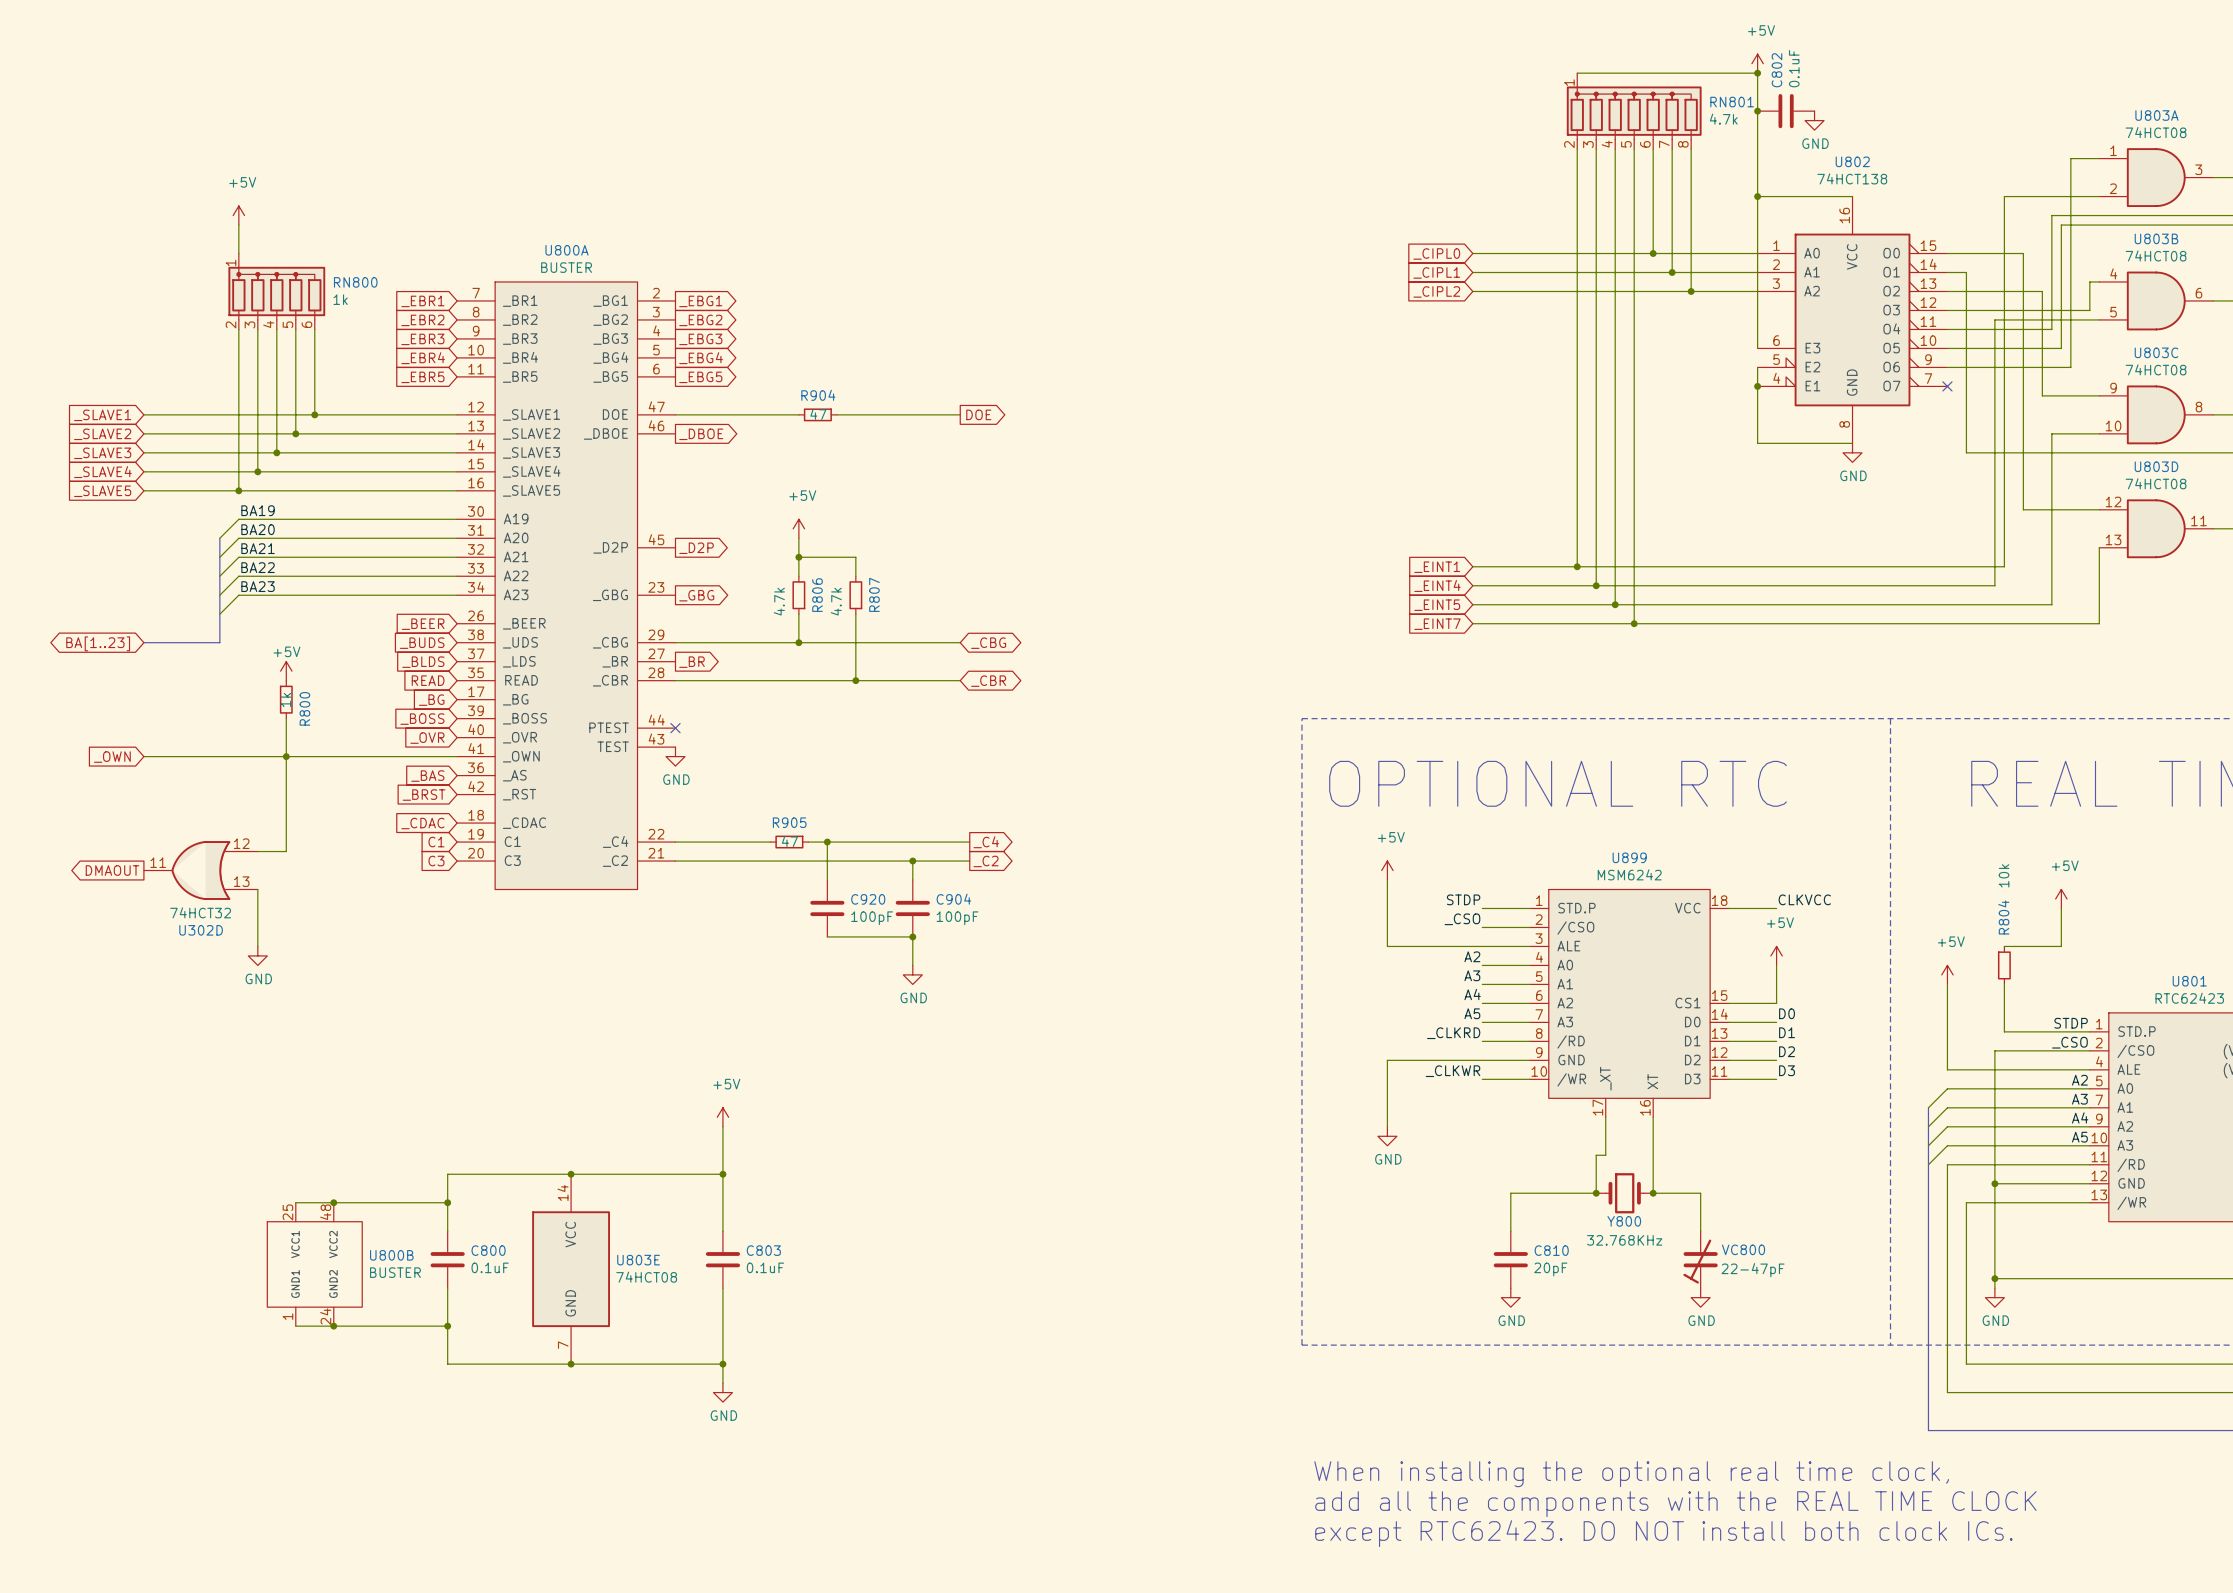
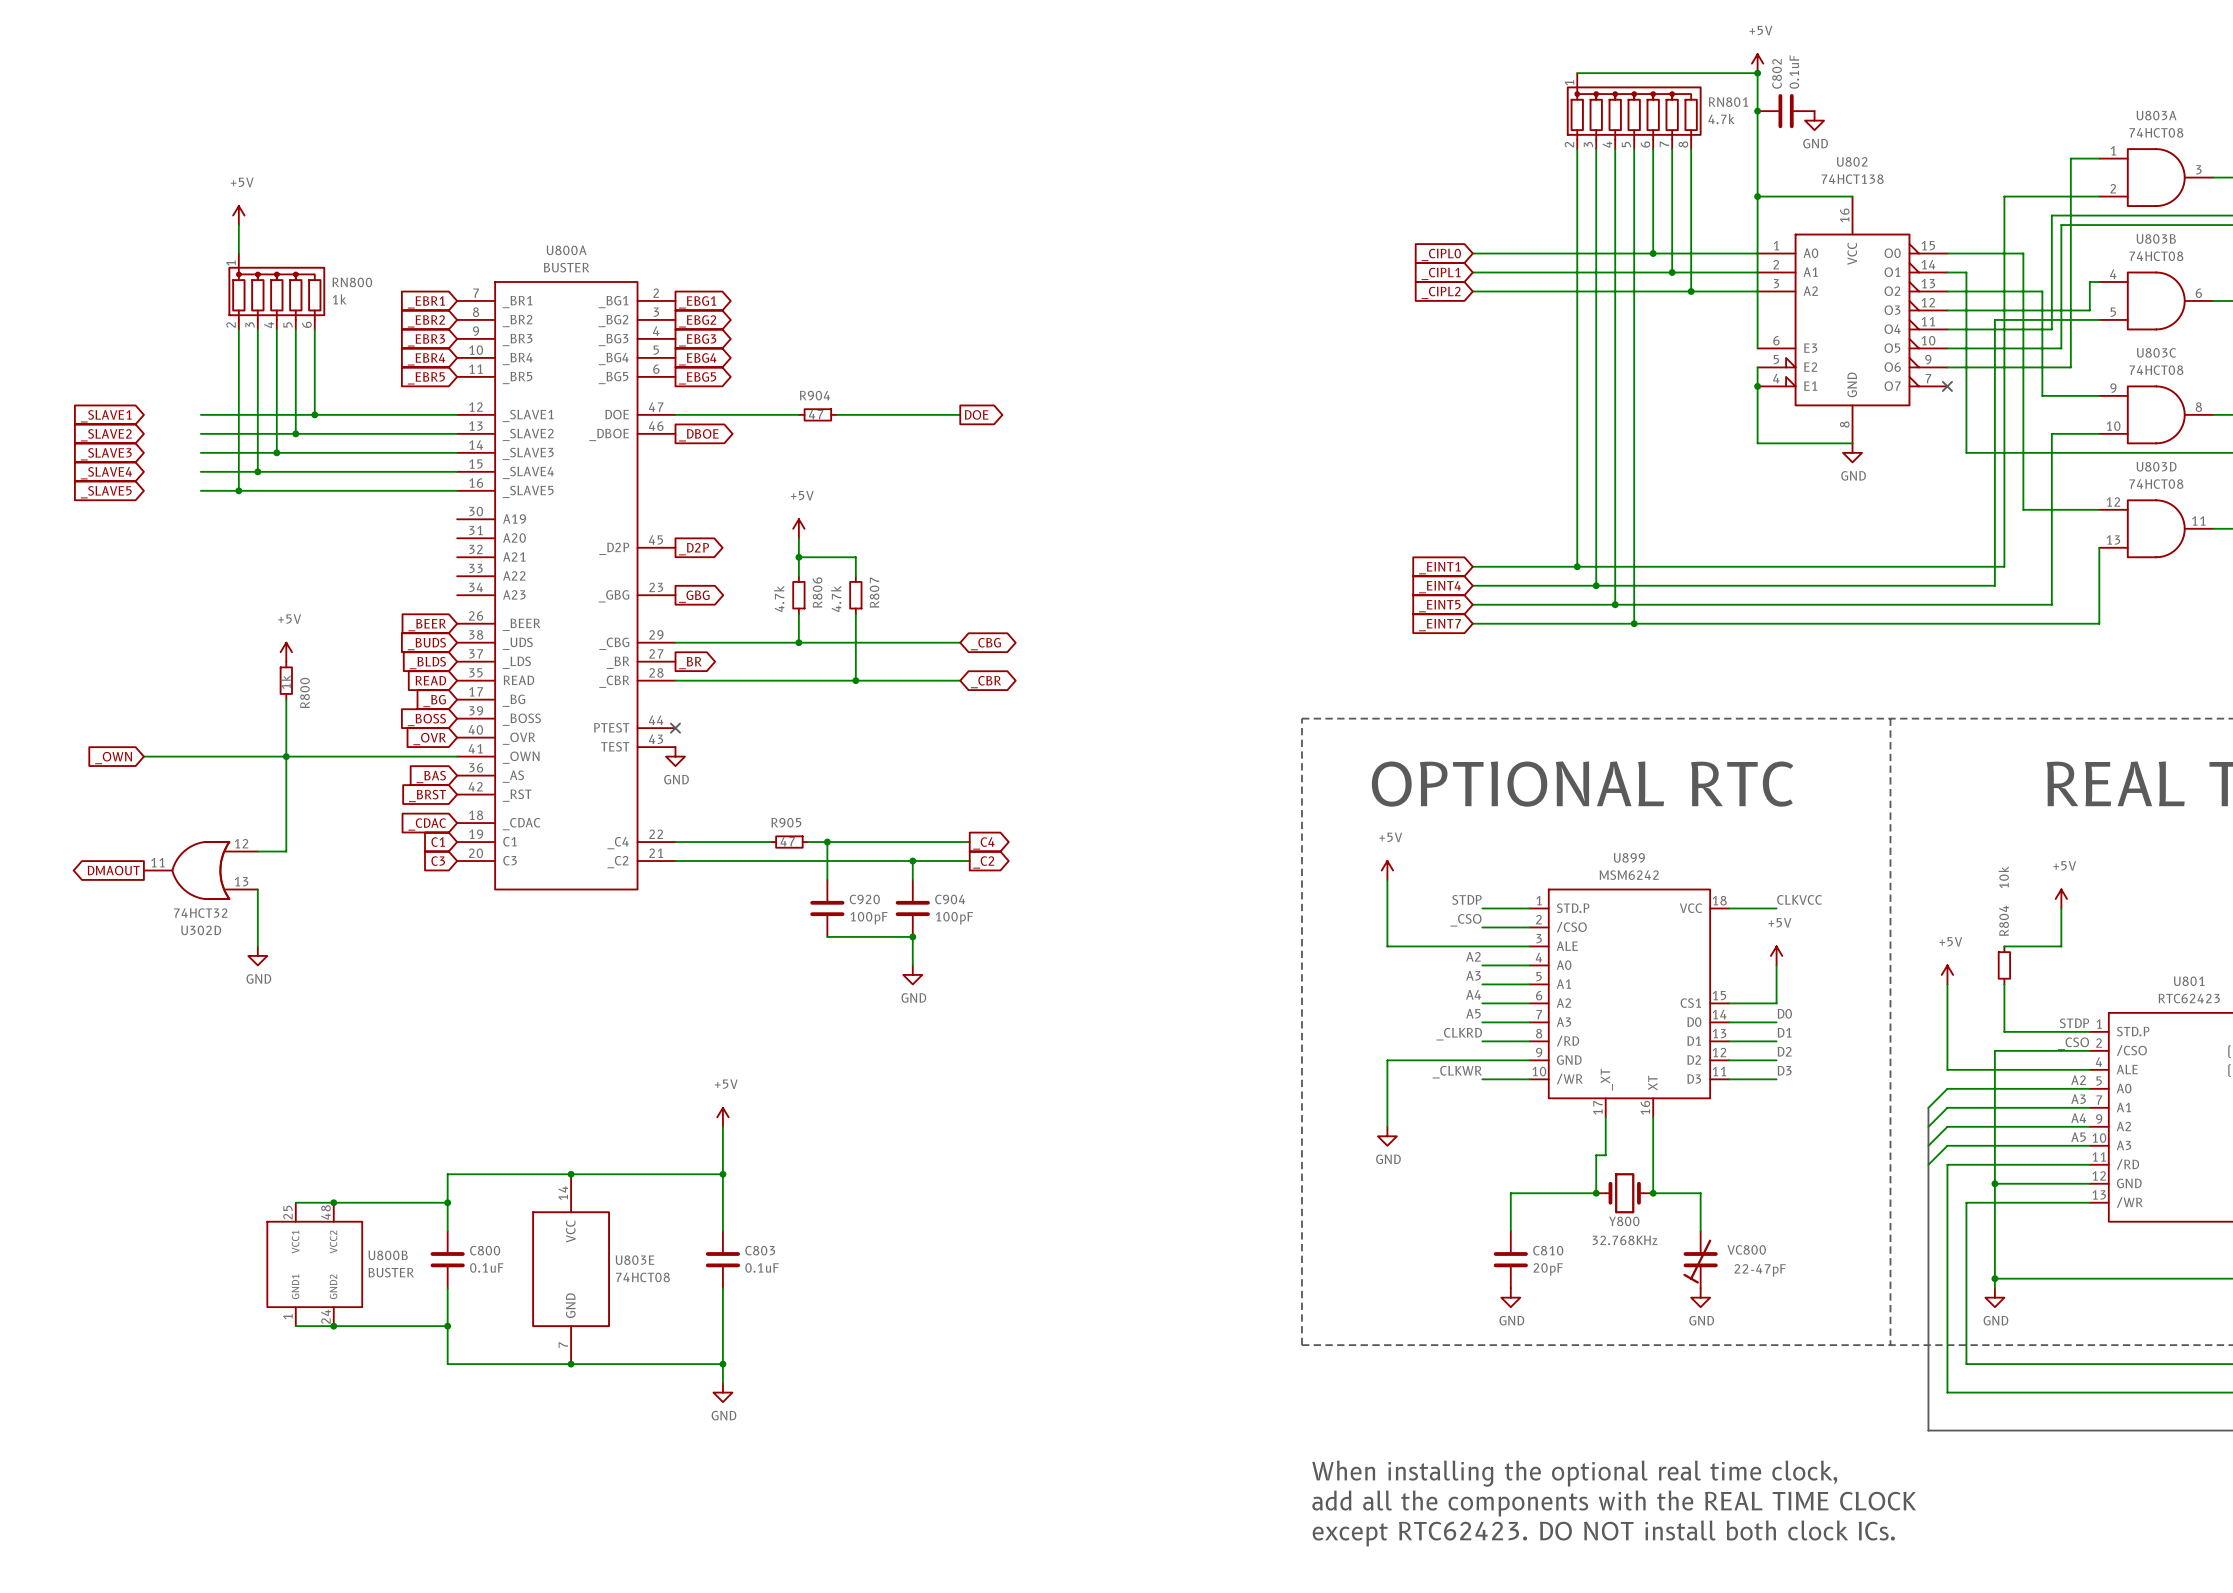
wire: (143, 414) (200, 414) -> none
wire: (143, 433) (200, 433) -> none
wire: (143, 452) (200, 452) -> none
wire: (143, 471) (200, 471) -> none
wire: (143, 490) (200, 490) -> none
label: BA19 (258, 510) -> none
wire: (457, 519) (238, 519) (219, 538) -> none
label: BA20 (258, 529) -> none
bus: (219, 538) (219, 642) (143, 642) -> none
wire: (457, 538) (238, 538) (219, 557) -> none
label: BA21 (258, 548) -> none
wire: (457, 557) (238, 557) (219, 576) -> none
label: BA22 (258, 567) -> none
wire: (457, 576) (238, 576) (219, 595) -> none
label: BA23 (258, 586) -> none
wire: (457, 595) (238, 595) (219, 614) -> none
global label: BA[1..23] (98, 643) -> none
power symbol text position: +5V (286, 651) -> +5V (289, 619)
power symbol position: +5V (286, 671) -> +5V (286, 652)
wire: none -> (286, 699) (286, 718)
R800 position: (286, 699) -> (286, 680)

